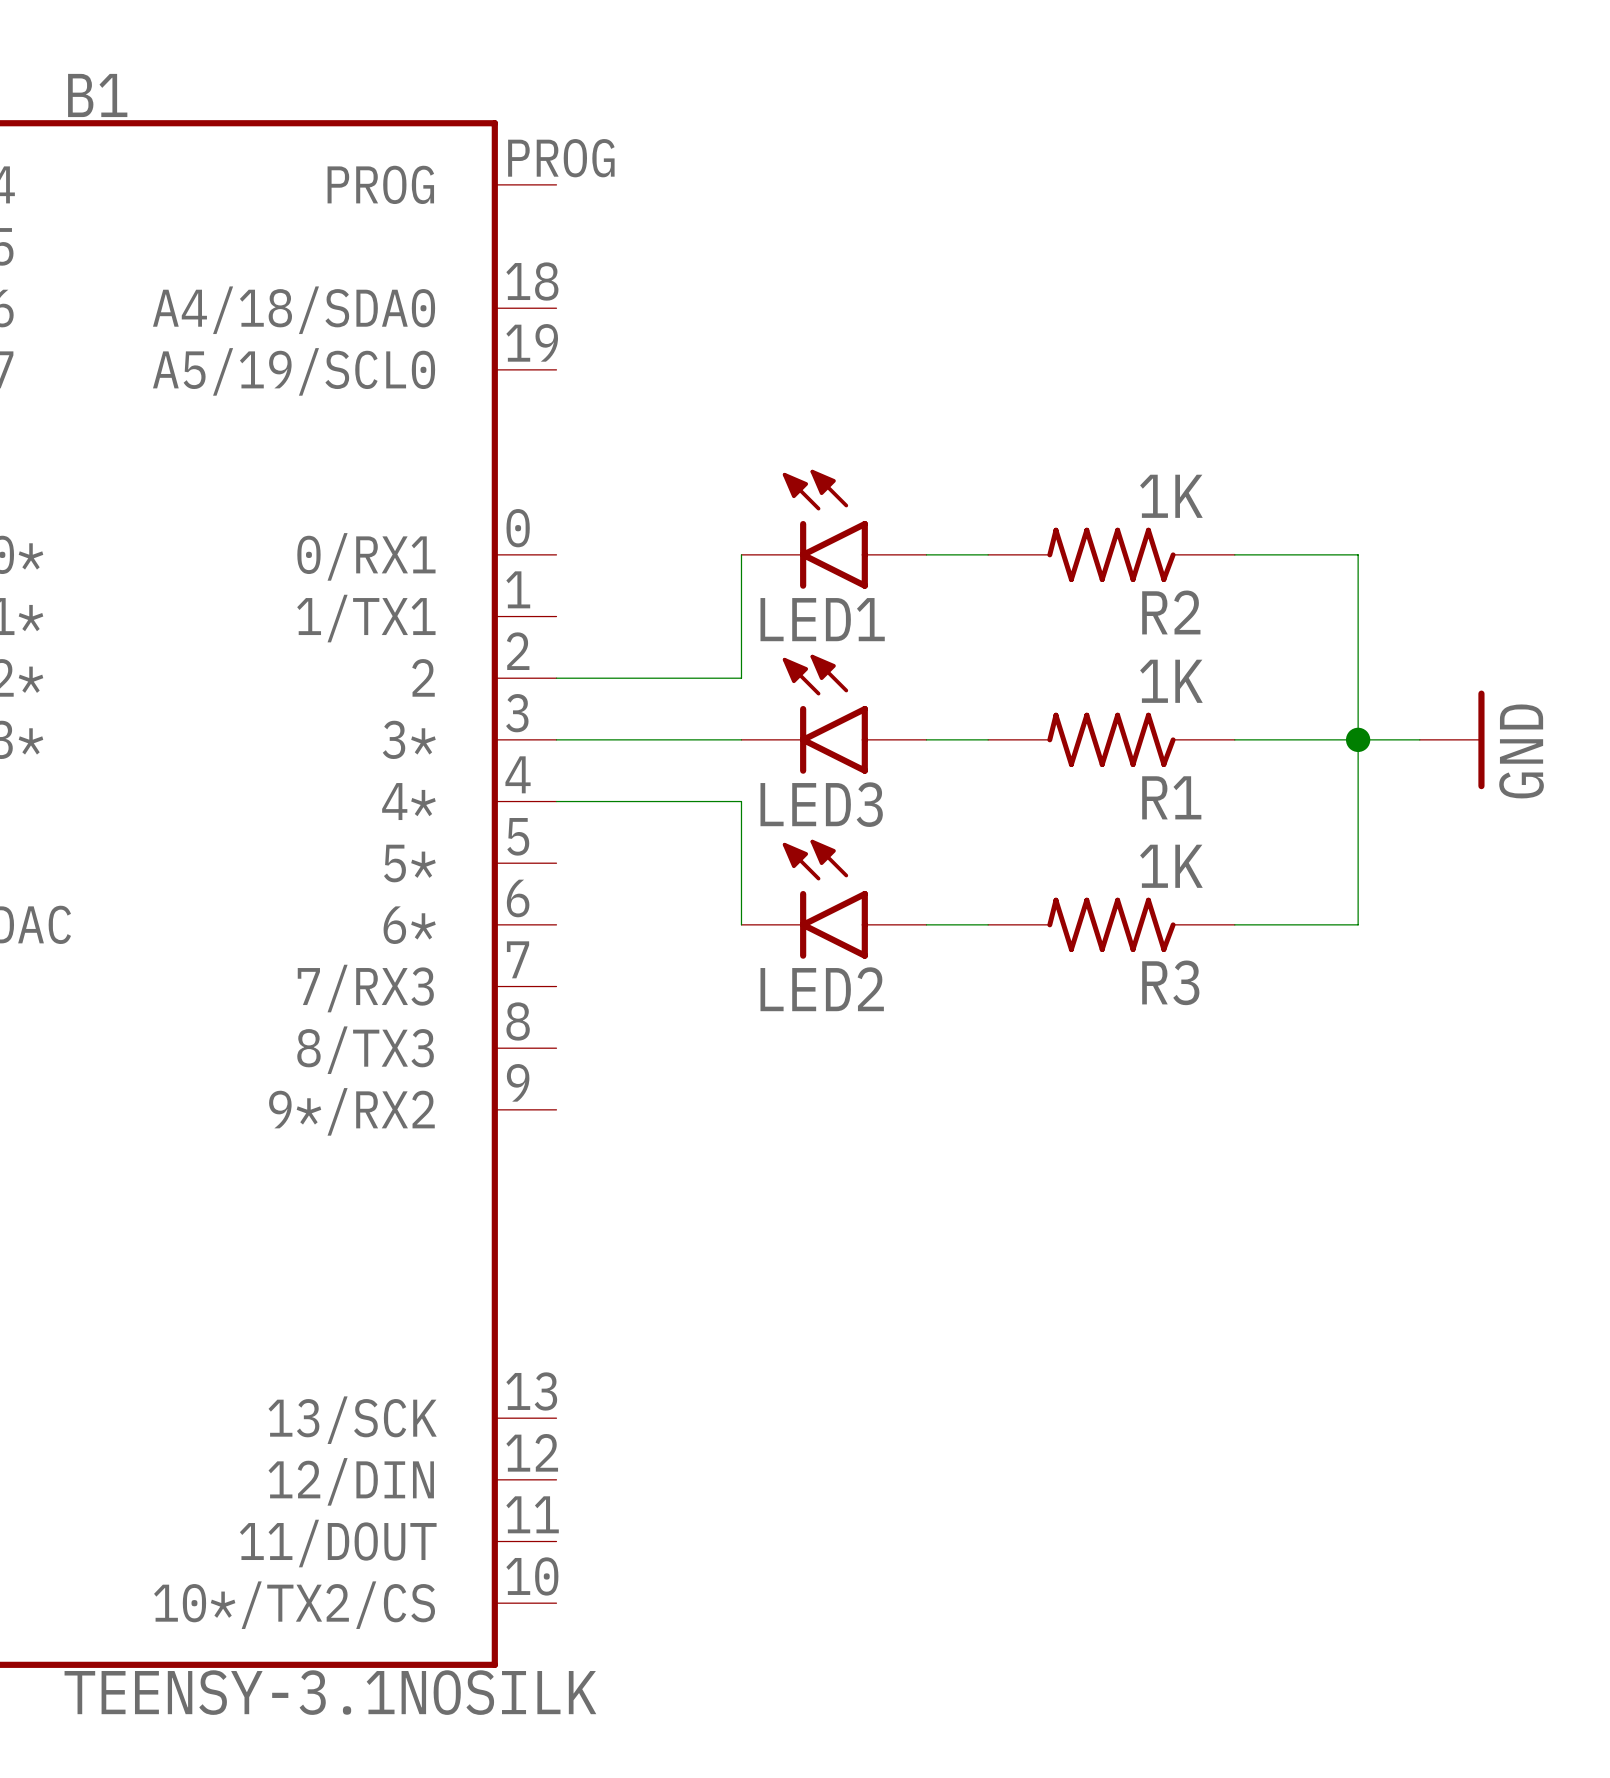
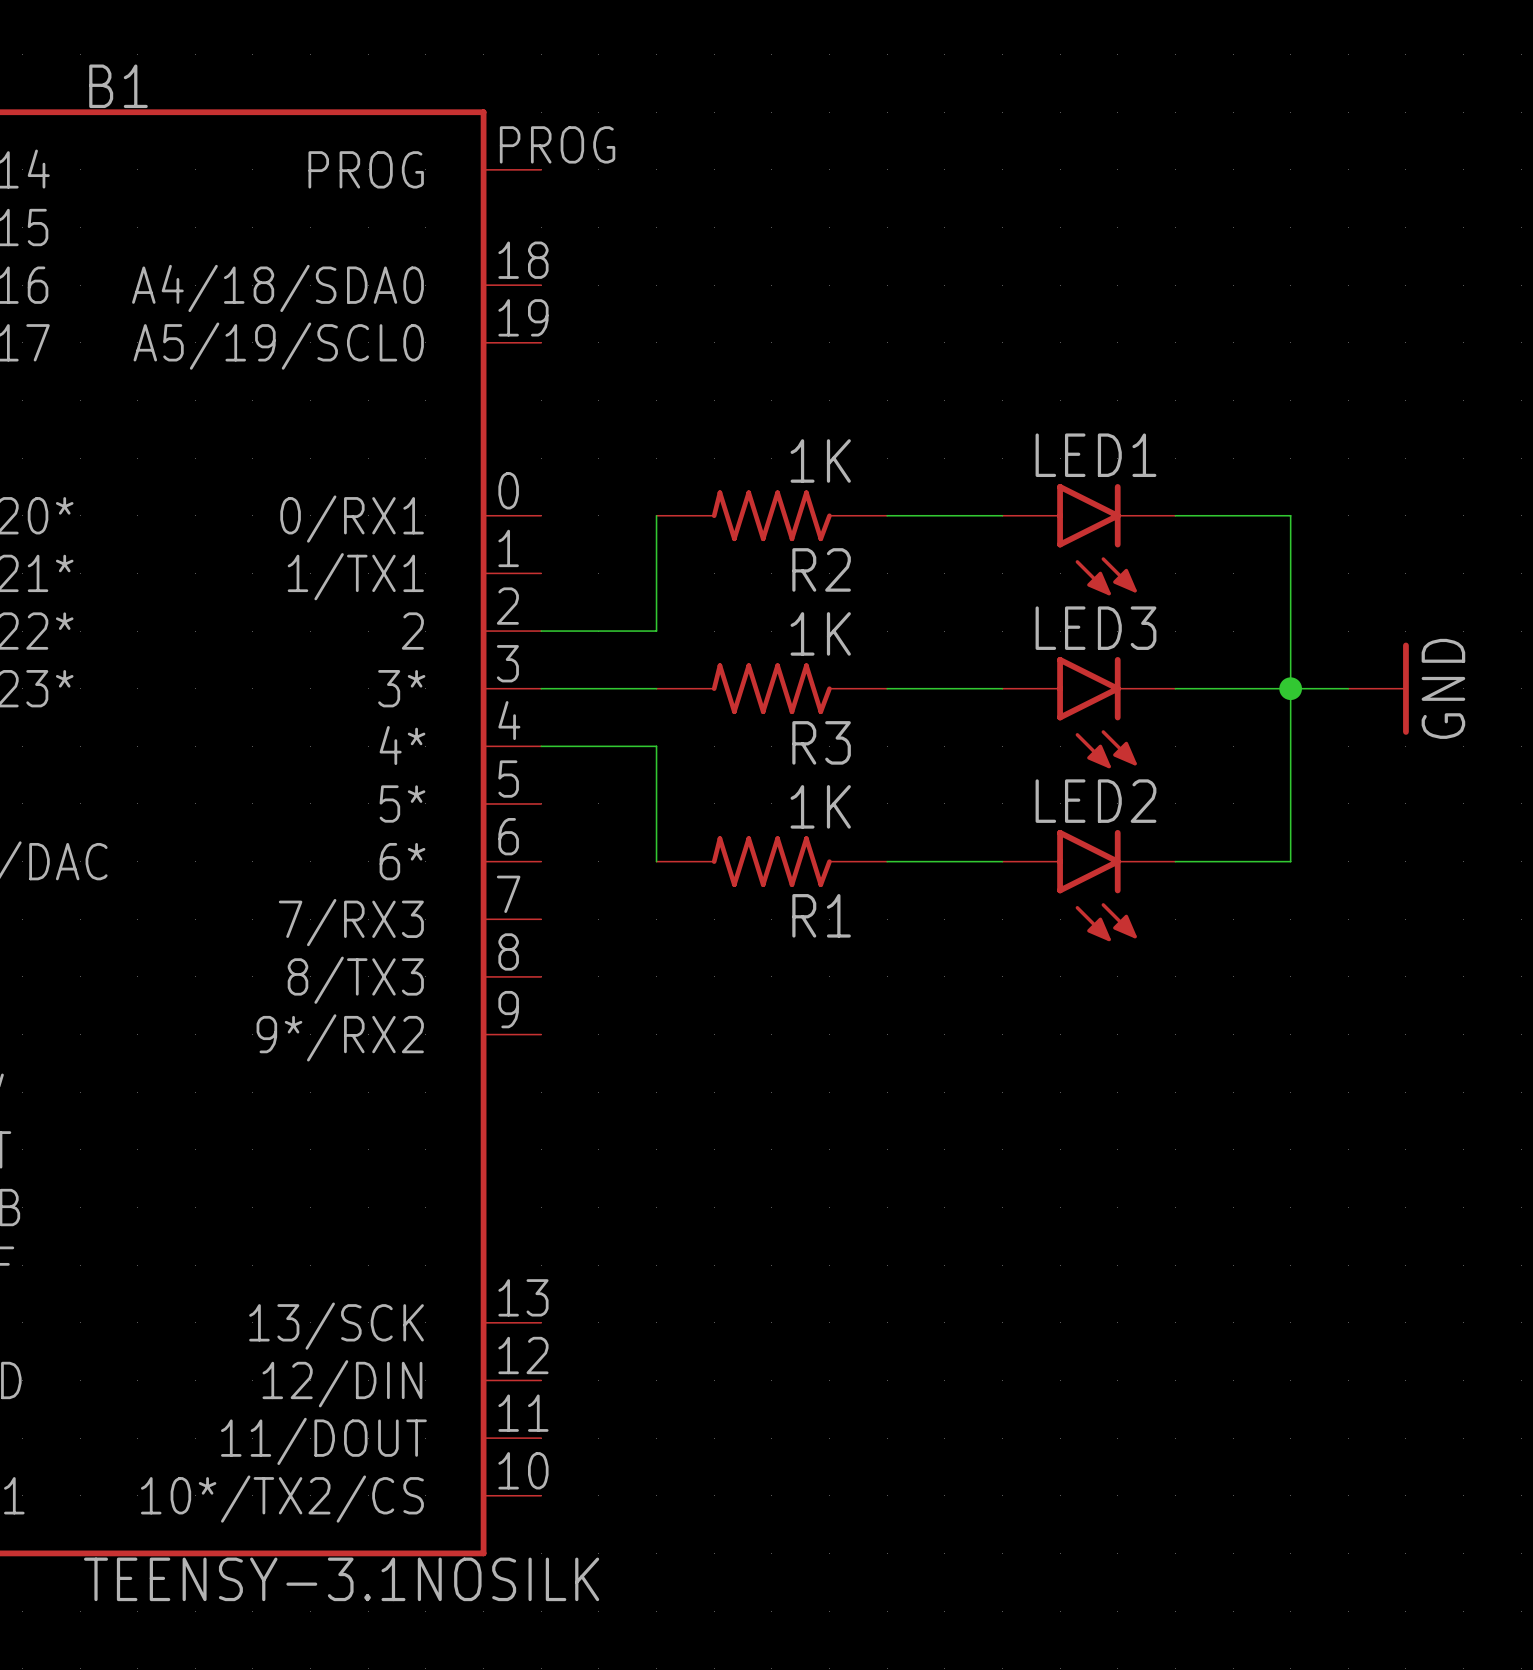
LED1 rotation: 0° (825, 529) -> 180° (1096, 539)
LED1 position: (833, 529) -> (1088, 539)
wire: (741, 554) (741, 678) (679, 678) -> (656, 515) (656, 631)
R2 position: (1111, 554) -> (771, 515)
LED3 rotation: 0° (825, 714) -> 180° (1096, 712)
LED3 position: (833, 714) -> (1088, 712)
R1 position: (1111, 739) -> (771, 861)
wire: (679, 801) (741, 801) (741, 924) -> (656, 746) (656, 861)
LED2 rotation: 0° (825, 899) -> 180° (1096, 885)
LED2 position: (833, 899) -> (1088, 885)
R3 position: (1111, 924) -> (771, 688)

